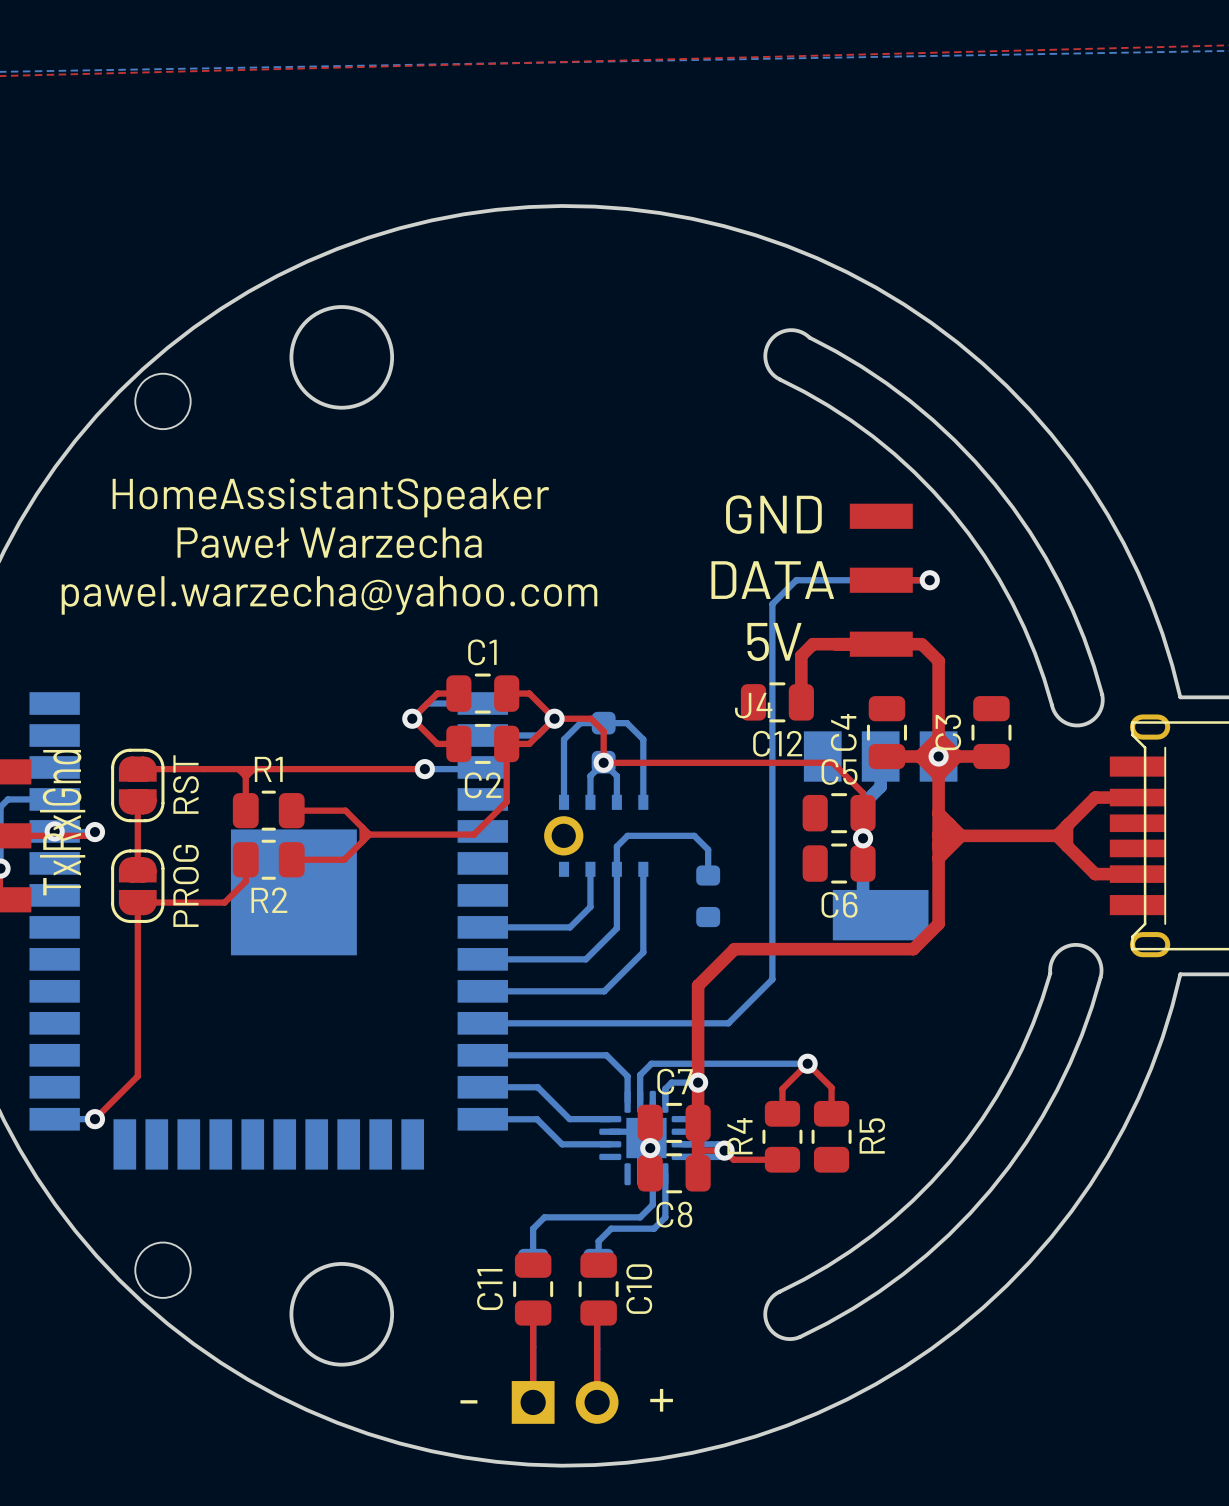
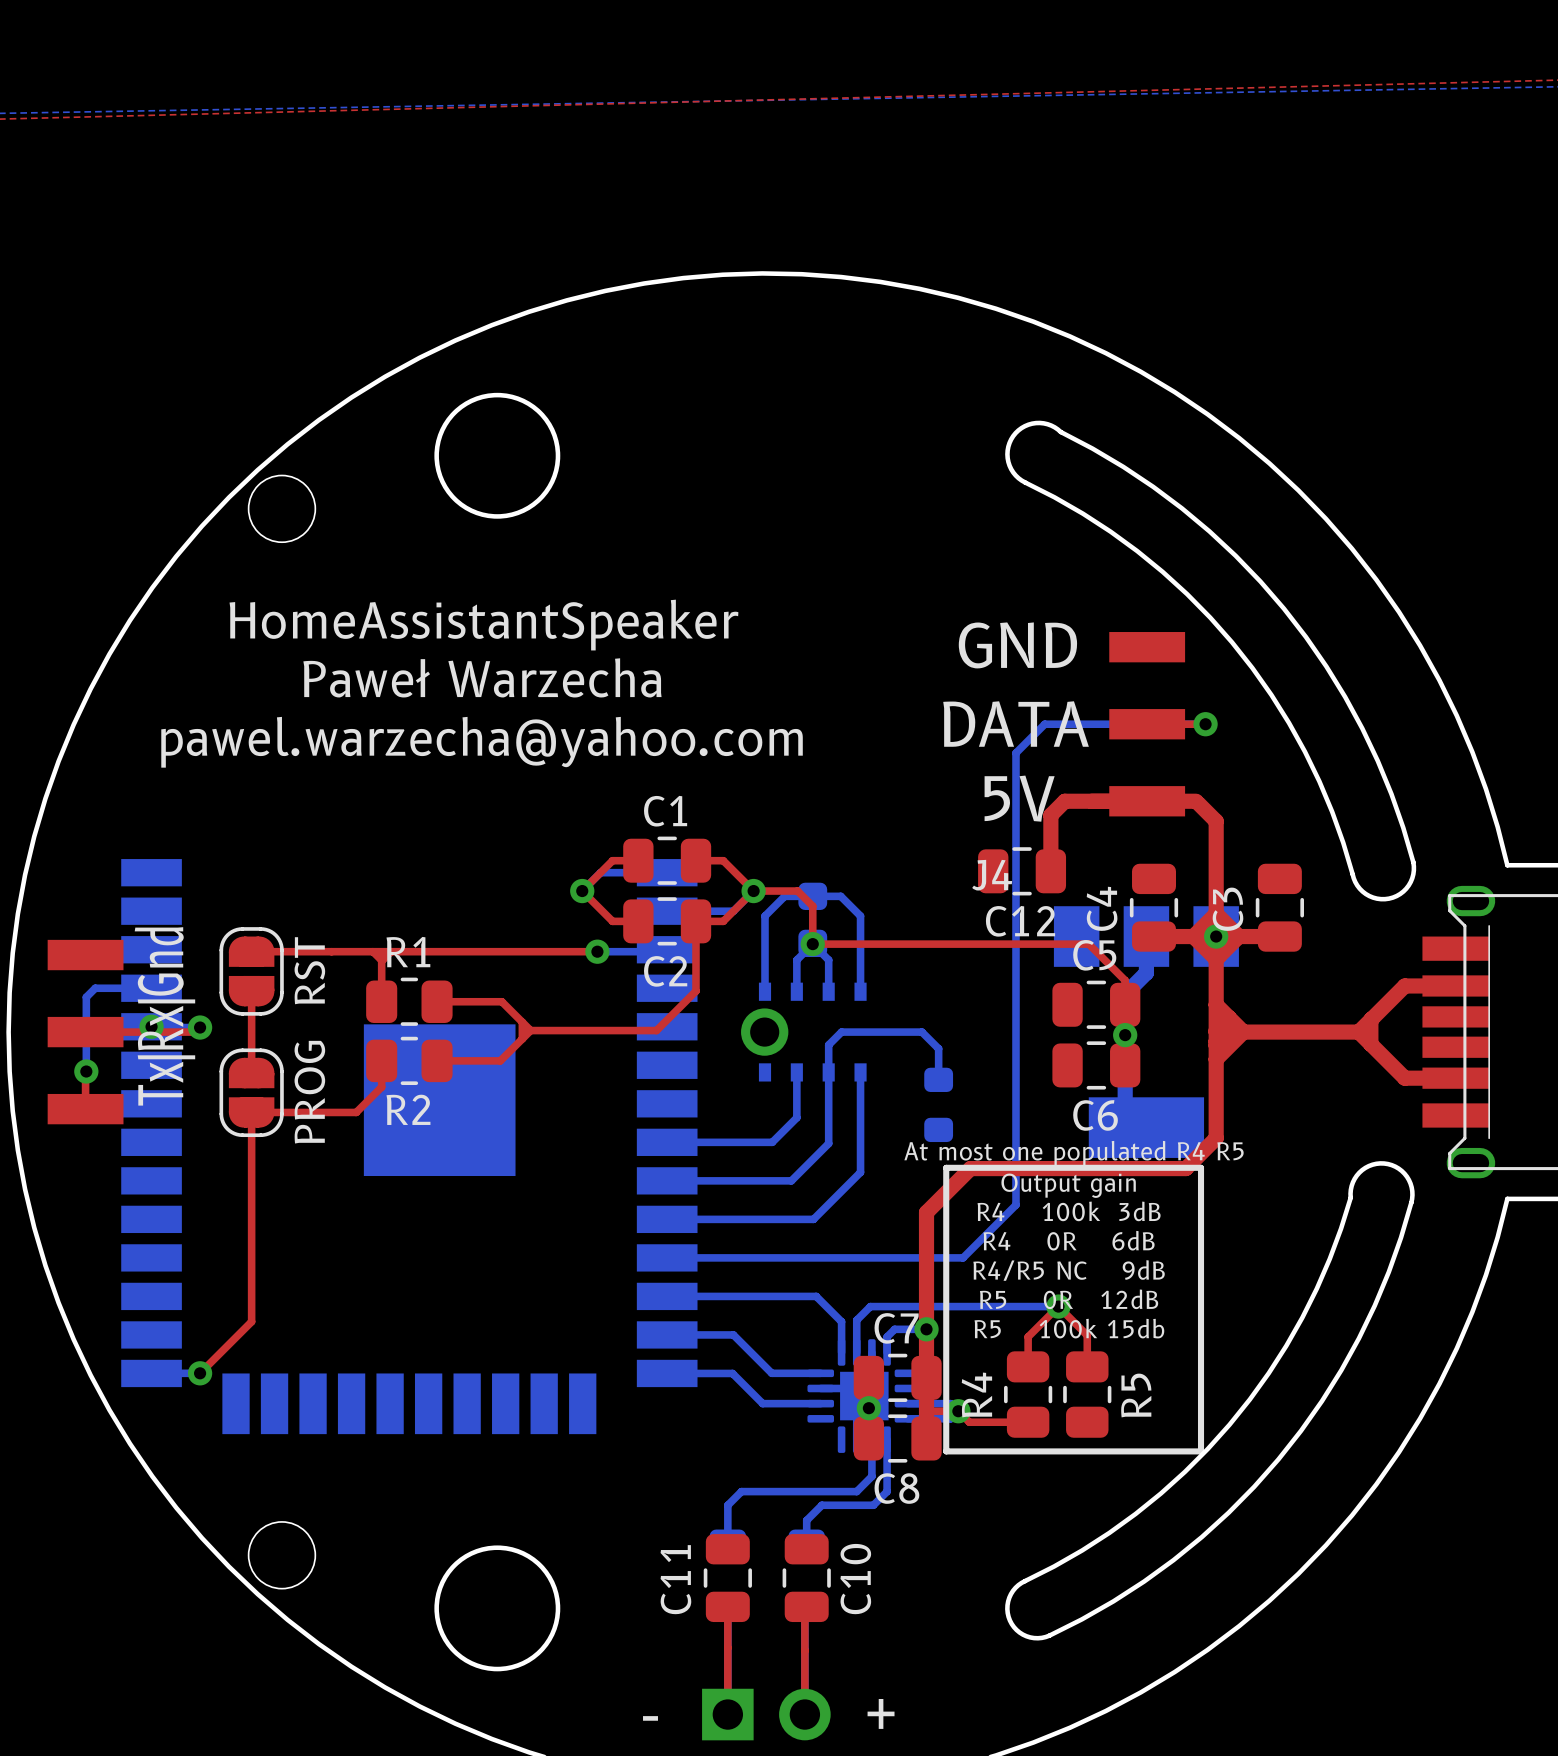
text: none -> At most one populated R4 R5 (1074, 1153)
line: none -> (946, 1167) (1201, 1167) (1201, 1451) (946, 1451) (946, 1167)
text: none -> Output gain (1068, 1185)
text: none -> R4 100k 3dB (1069, 1211)
text: none -> R4 0R 6dB (1069, 1240)
text: none -> R4/R5 NC 9dB (1069, 1270)
text: none -> R5 0R 12dB (1069, 1299)
text: none -> R5 100k 15db (1069, 1328)

